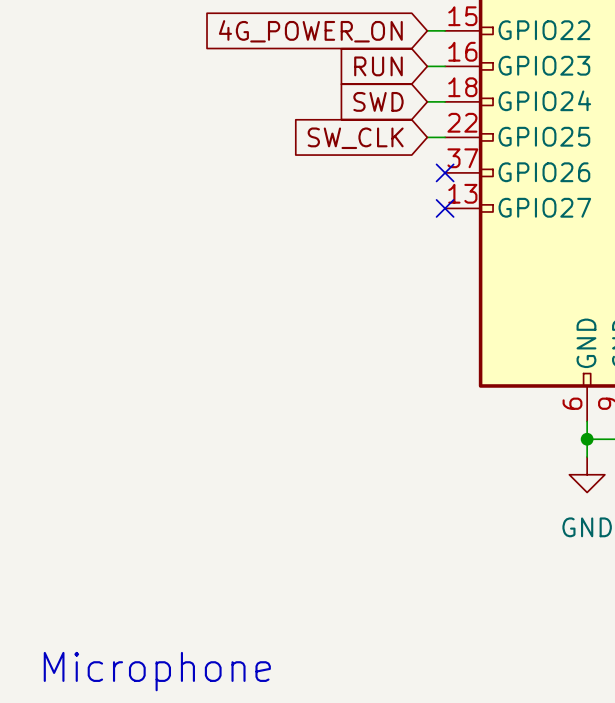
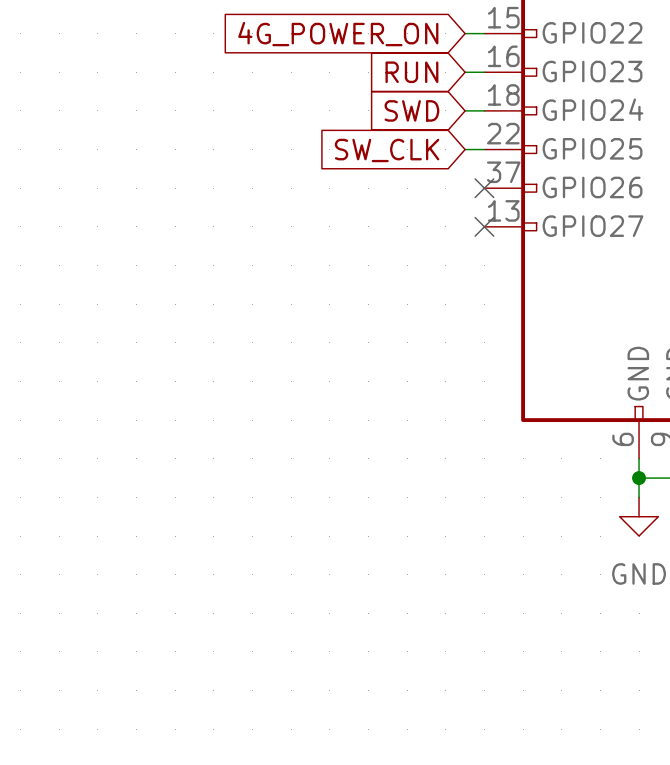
text: Microphone (157, 671) -> none

